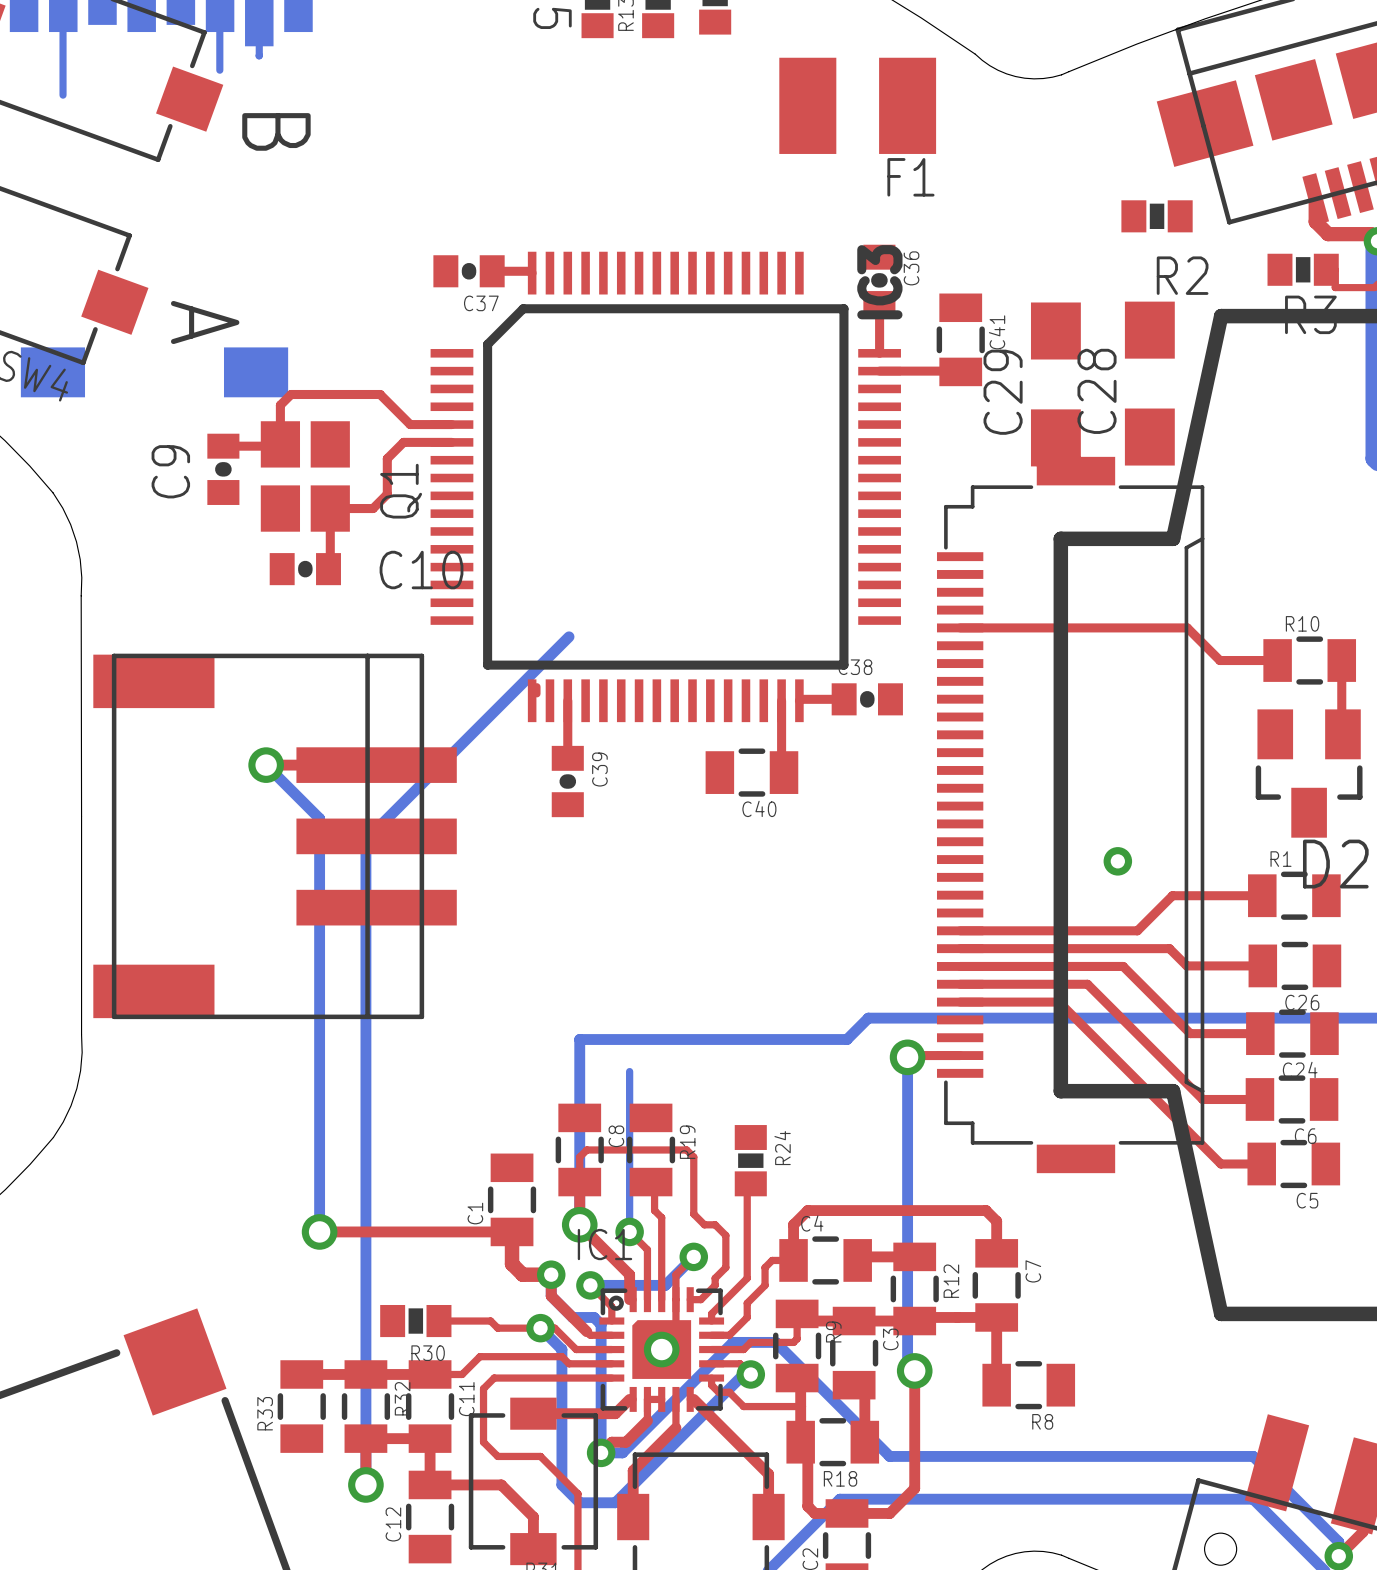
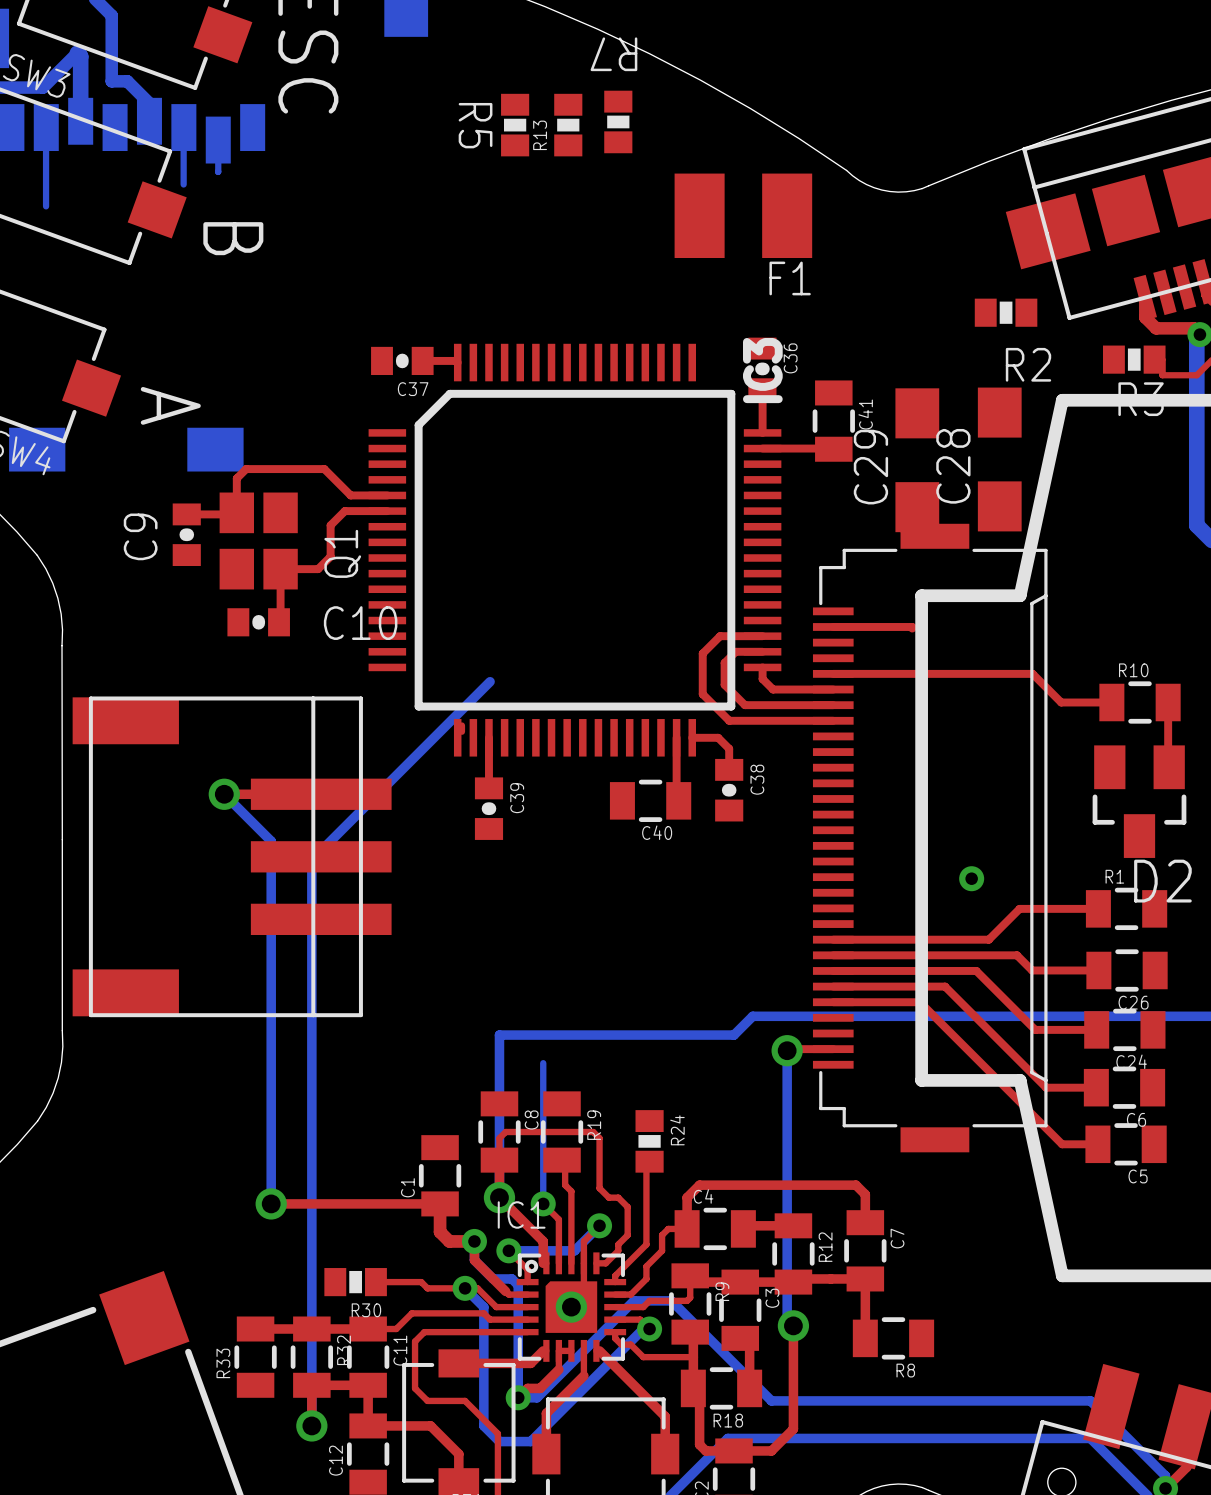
top track: none -> (833, 626) (912, 626) (912, 628)
top track: none -> (762, 636) (720, 636) (702, 653) (702, 694) (729, 720) (833, 720)
top track: none -> (762, 651) (735, 651) (724, 662) (724, 684) (744, 705) (833, 705)
top track: none -> (762, 667) (762, 679) (773, 689) (833, 689)
top track: (844, 699) (799, 700) -> (729, 769) (729, 748) (718, 737) (692, 737)
C38 rotation: 0° (867, 699) -> 90° clockwise (729, 790)
C38 position: (867, 699) -> (729, 790)

